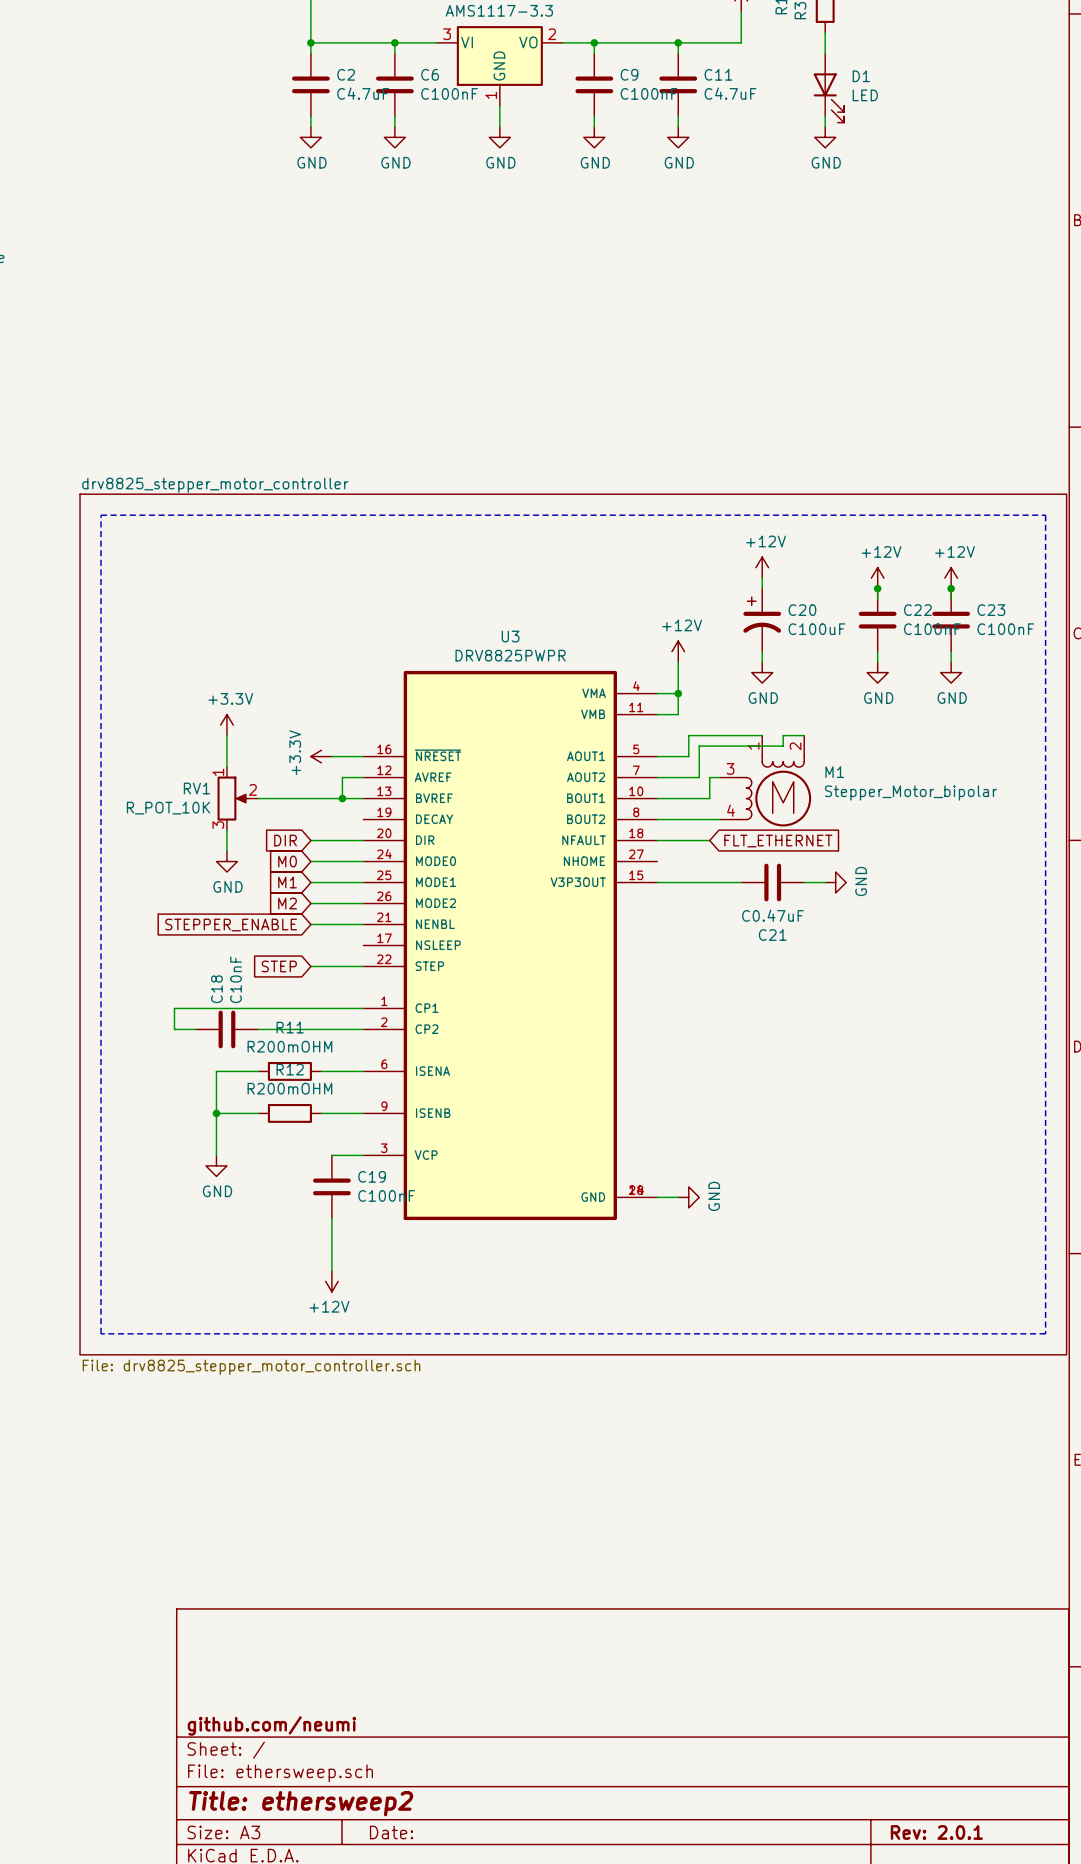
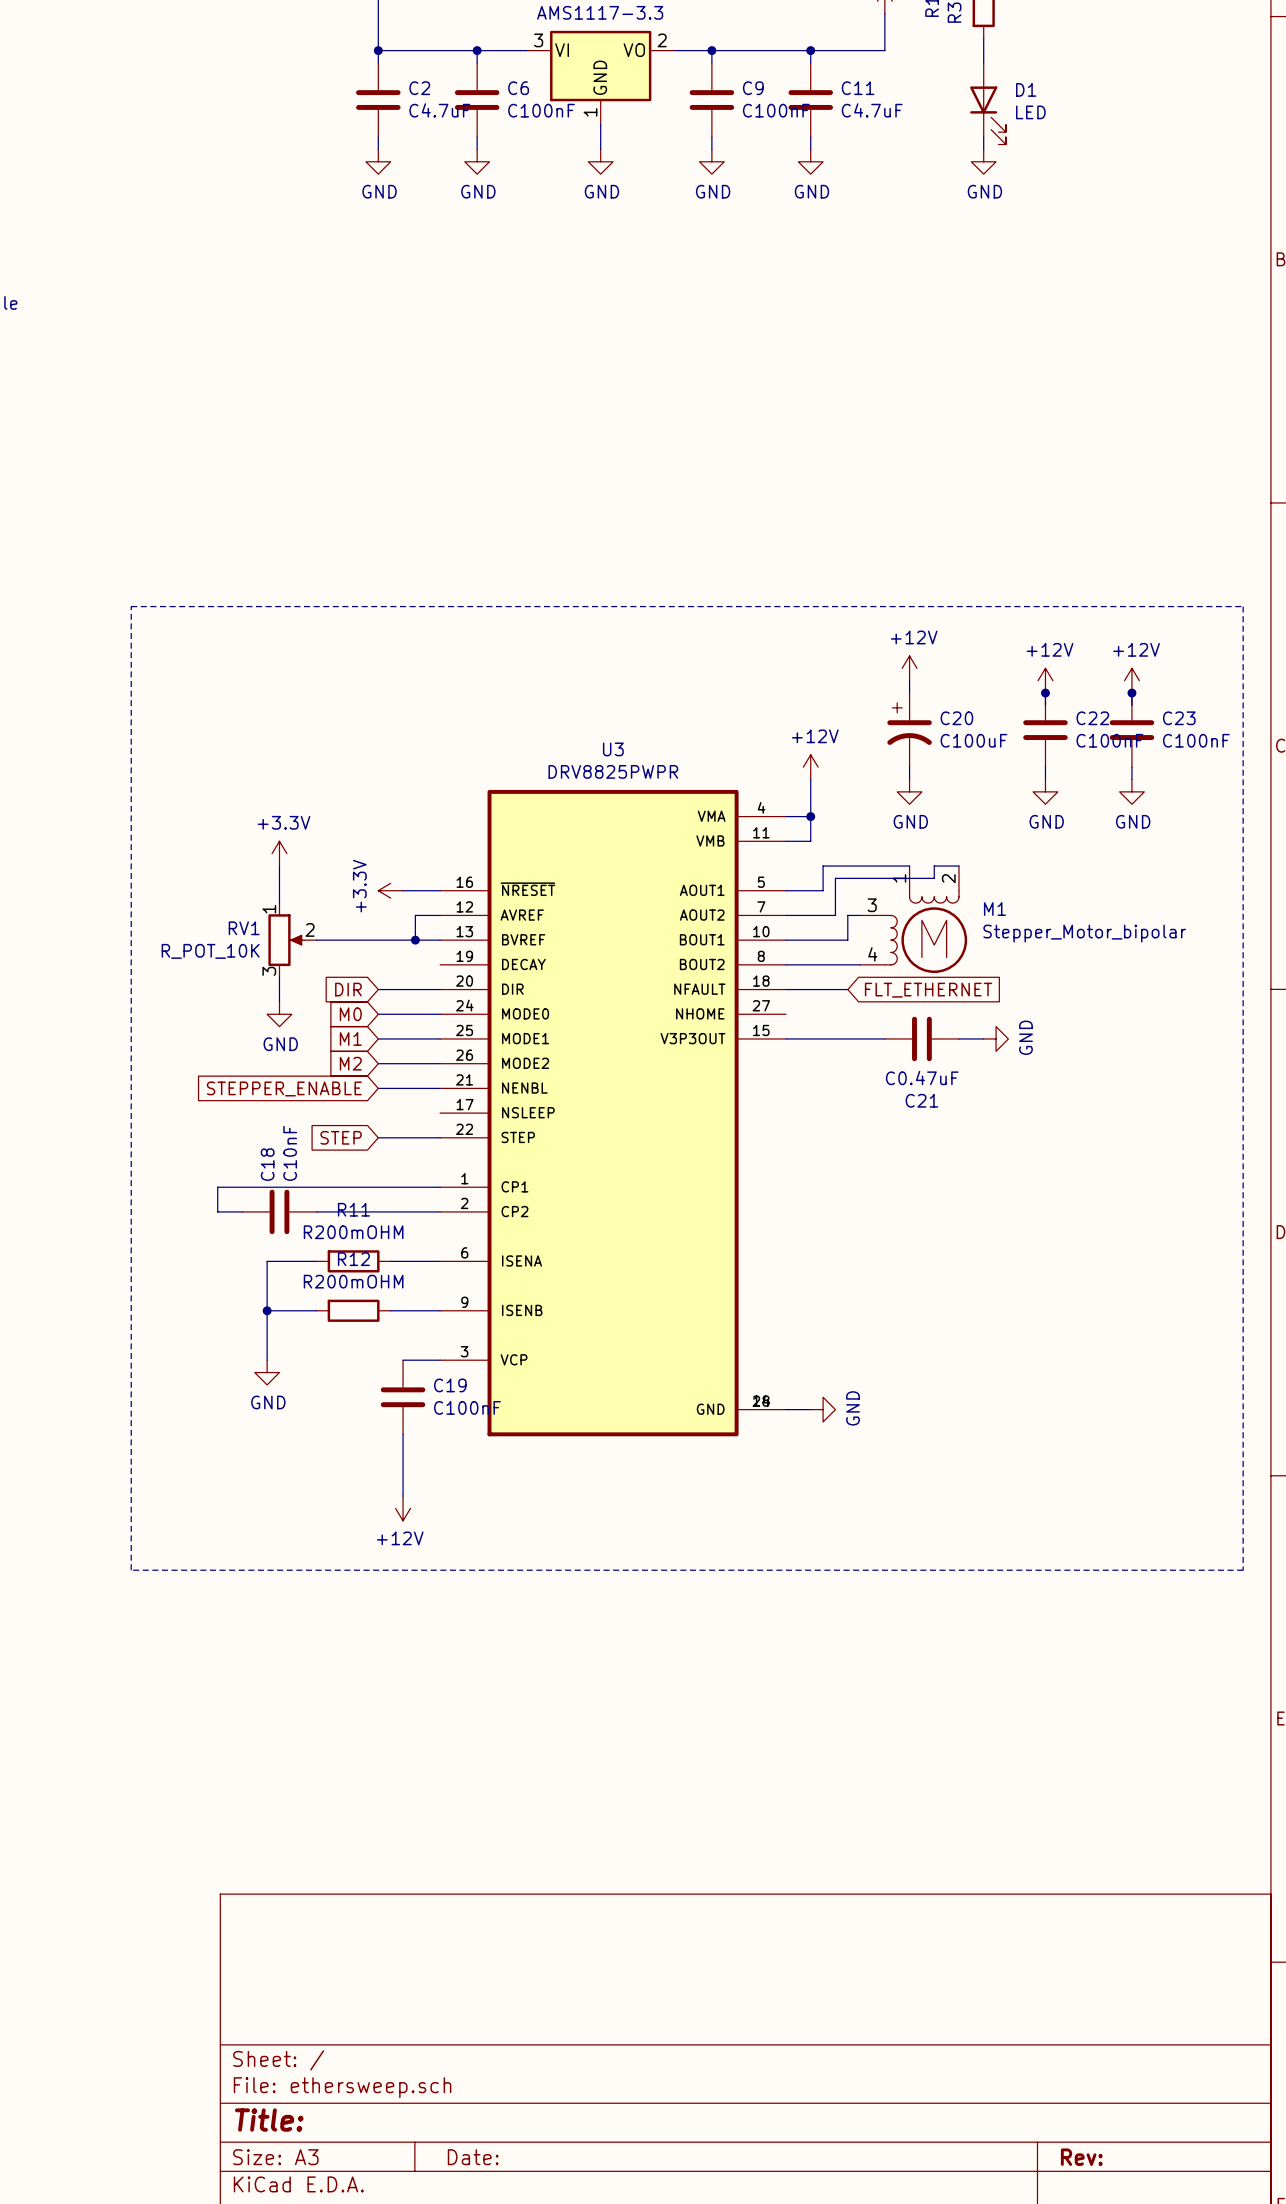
sheet drv8825_stepper_motor_controller: File: drv8825_stepper_motor_controller.sch (573, 924) -> none
title block: github.com/neumi (271, 1725) -> none
title block: Title: ethersweep2 (301, 1803) -> Title: (269, 2120)
title block: Rev: 2.0.1 (936, 1832) -> Rev: (1081, 2157)

